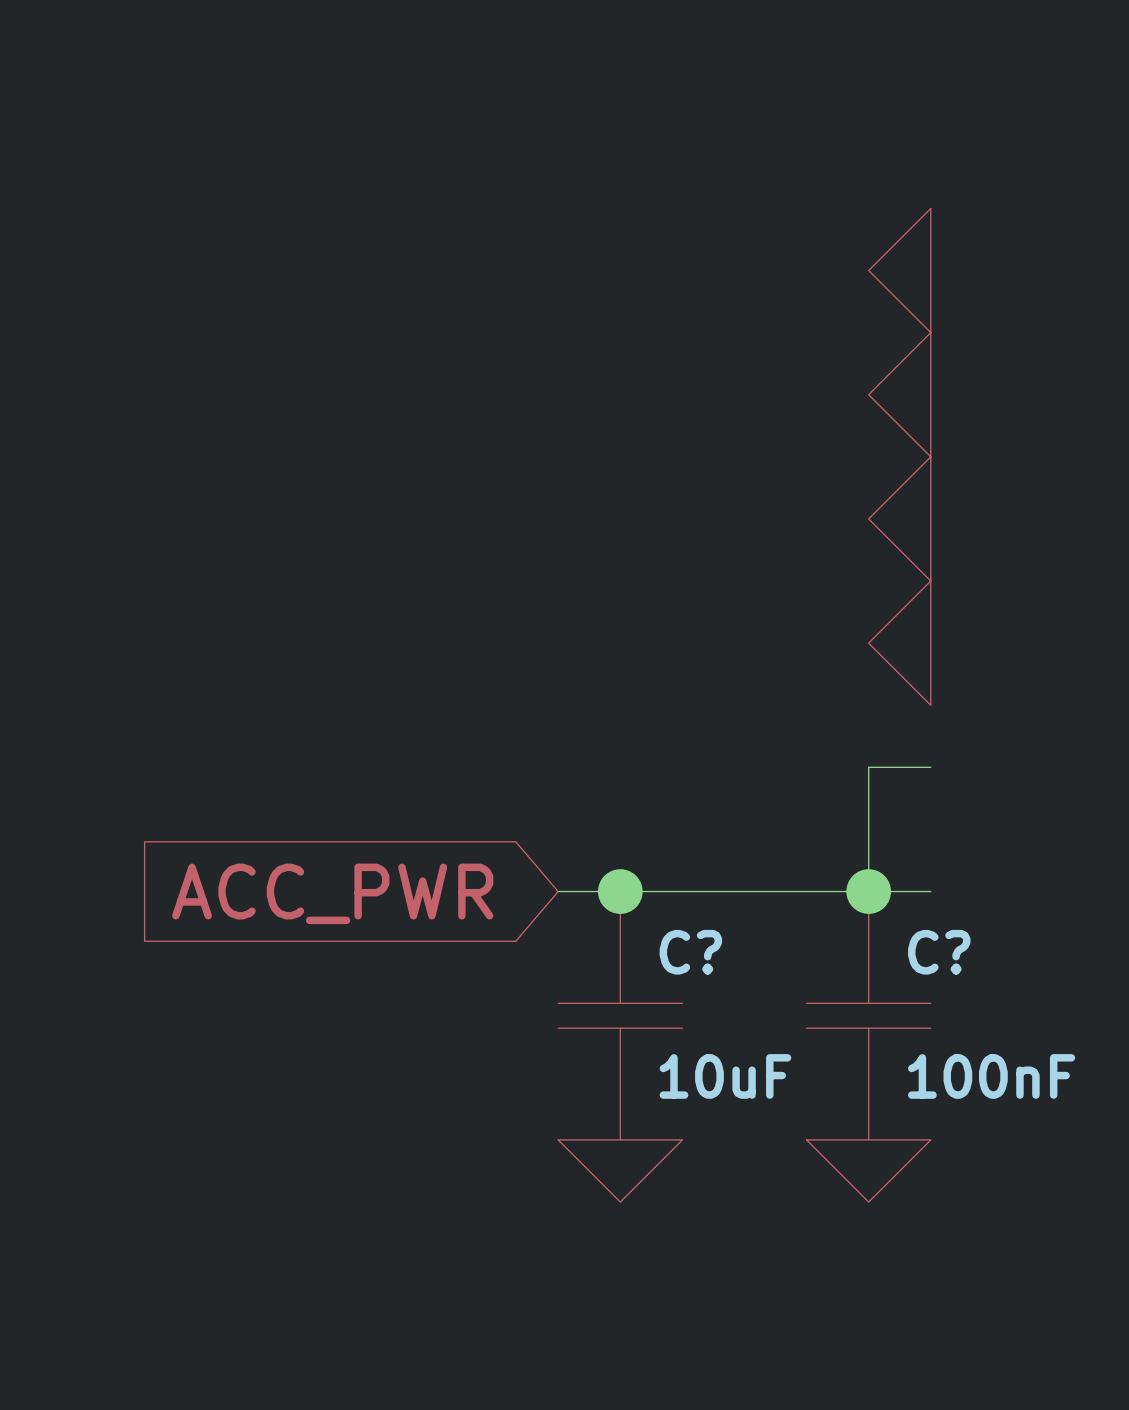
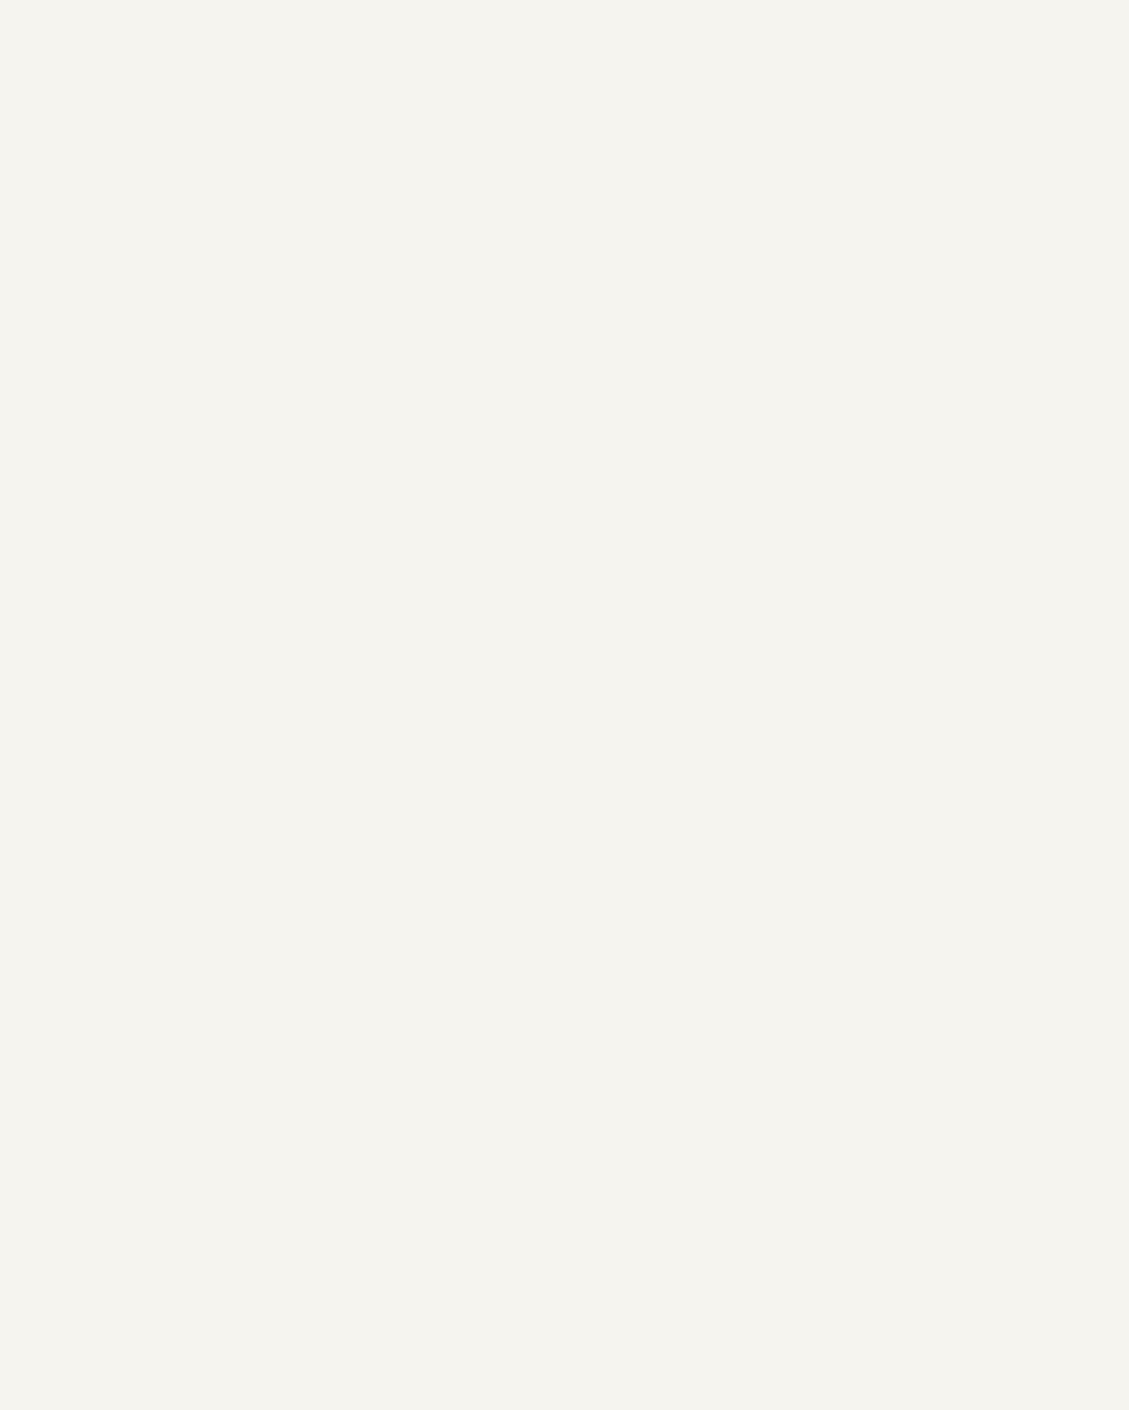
power symbol: (899, 270) -> none
power symbol: (899, 394) -> none
power symbol: (899, 518) -> none
power symbol: (899, 643) -> none
wire: (930, 767) (868, 767) (868, 891) -> none
wire: (558, 891) (930, 891) -> none
junction: (620, 891) -> none
junction: (868, 891) -> none
global label: ACC_PWR (332, 893) -> none
C?: 10uF (620, 1015) -> none
C?: 100nF (868, 1015) -> none
power symbol: (620, 1170) -> none
power symbol: (868, 1170) -> none

